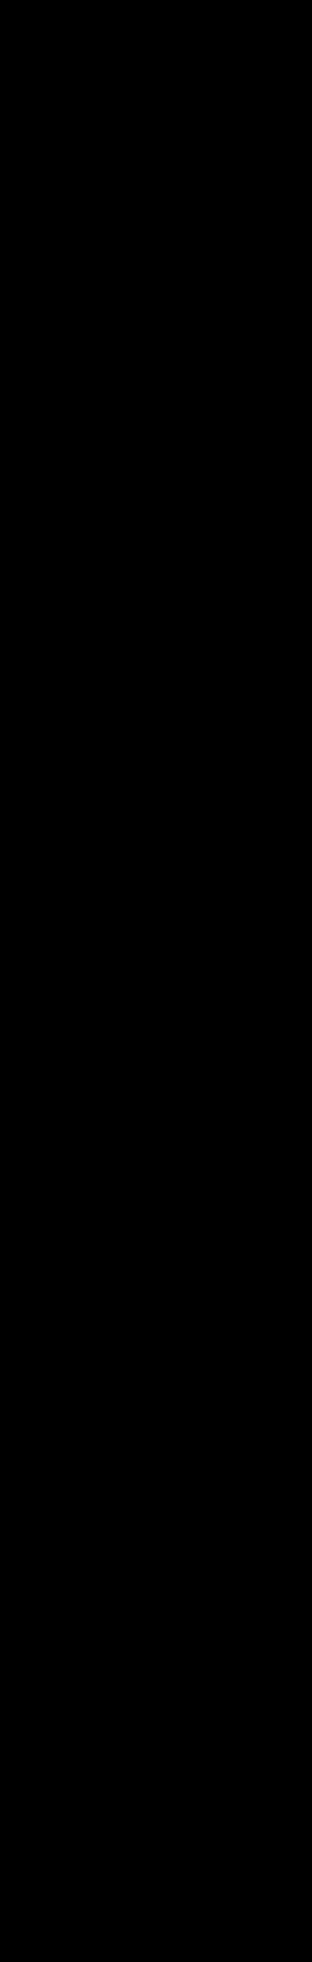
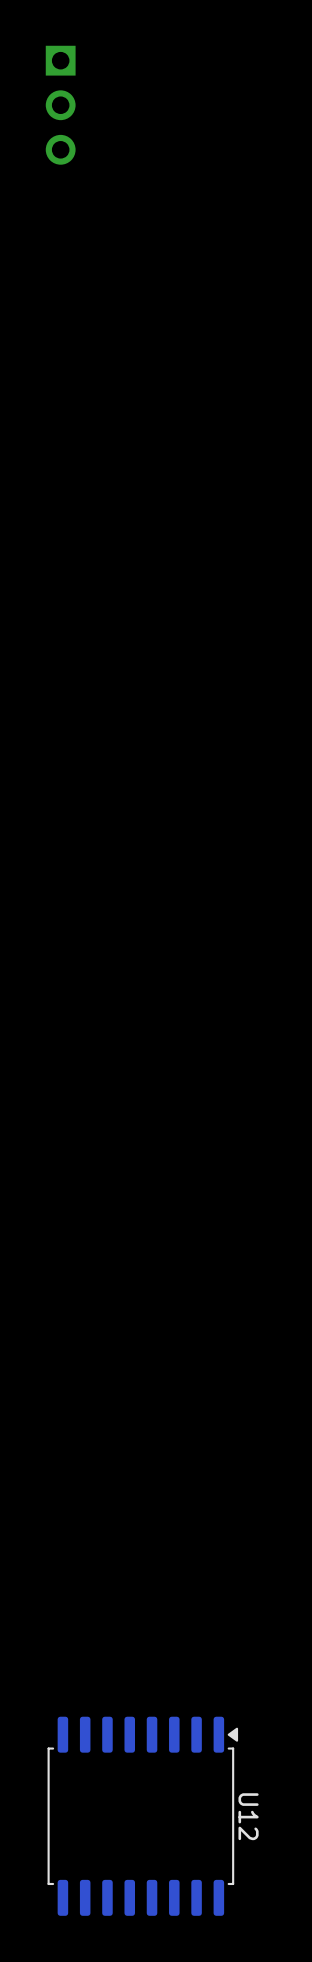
part: none -> (60, 105)
U12: none -> (142, 1816)

